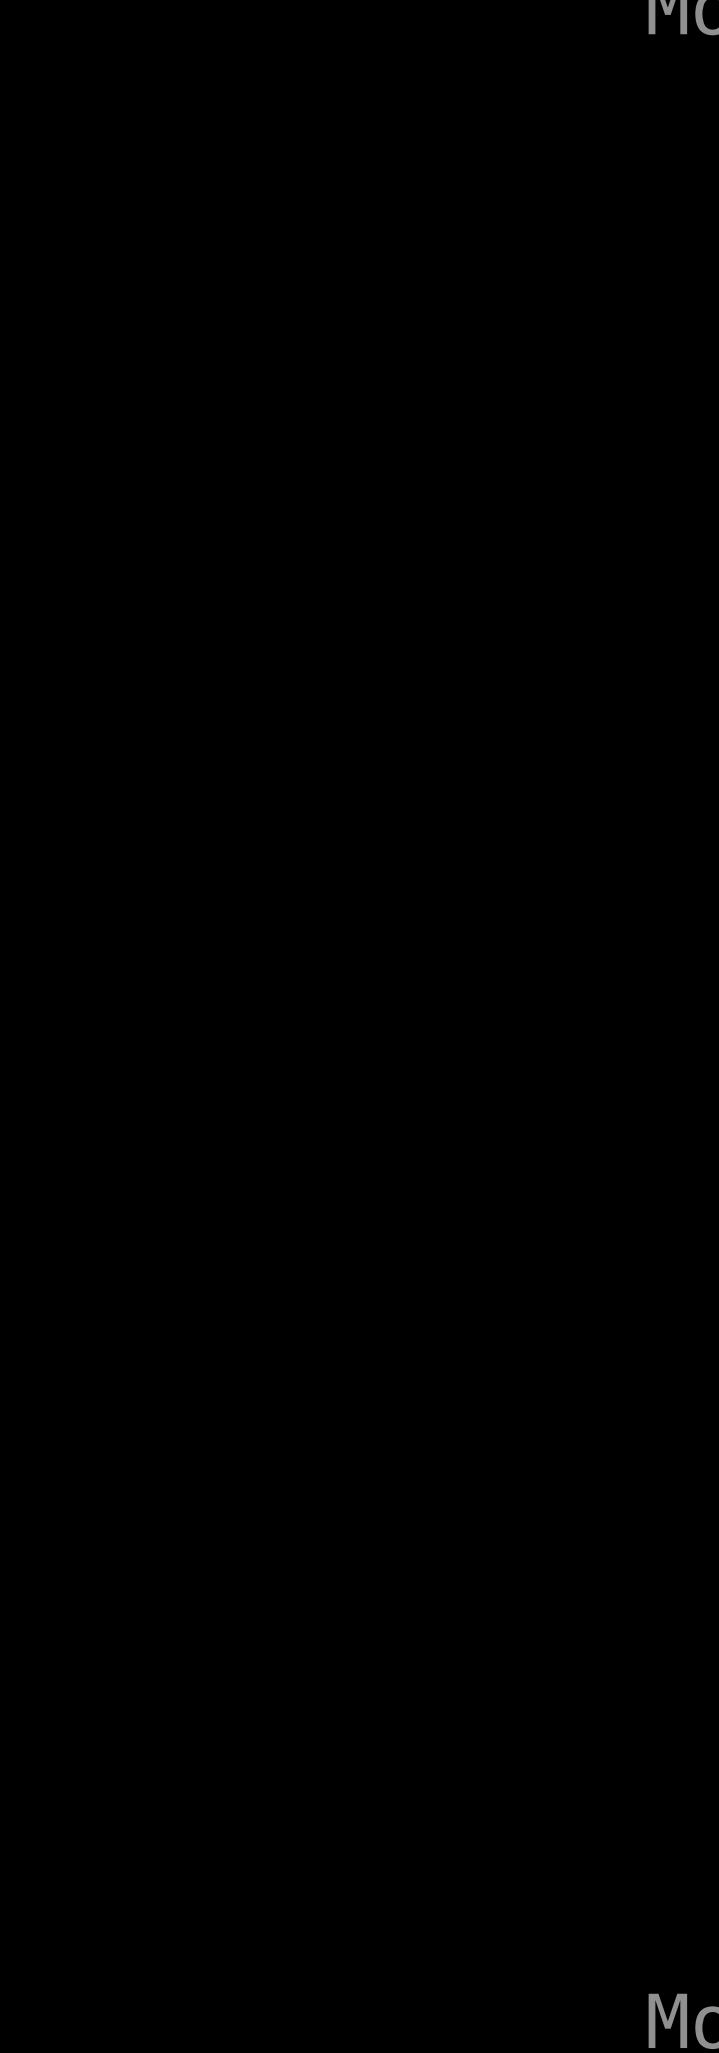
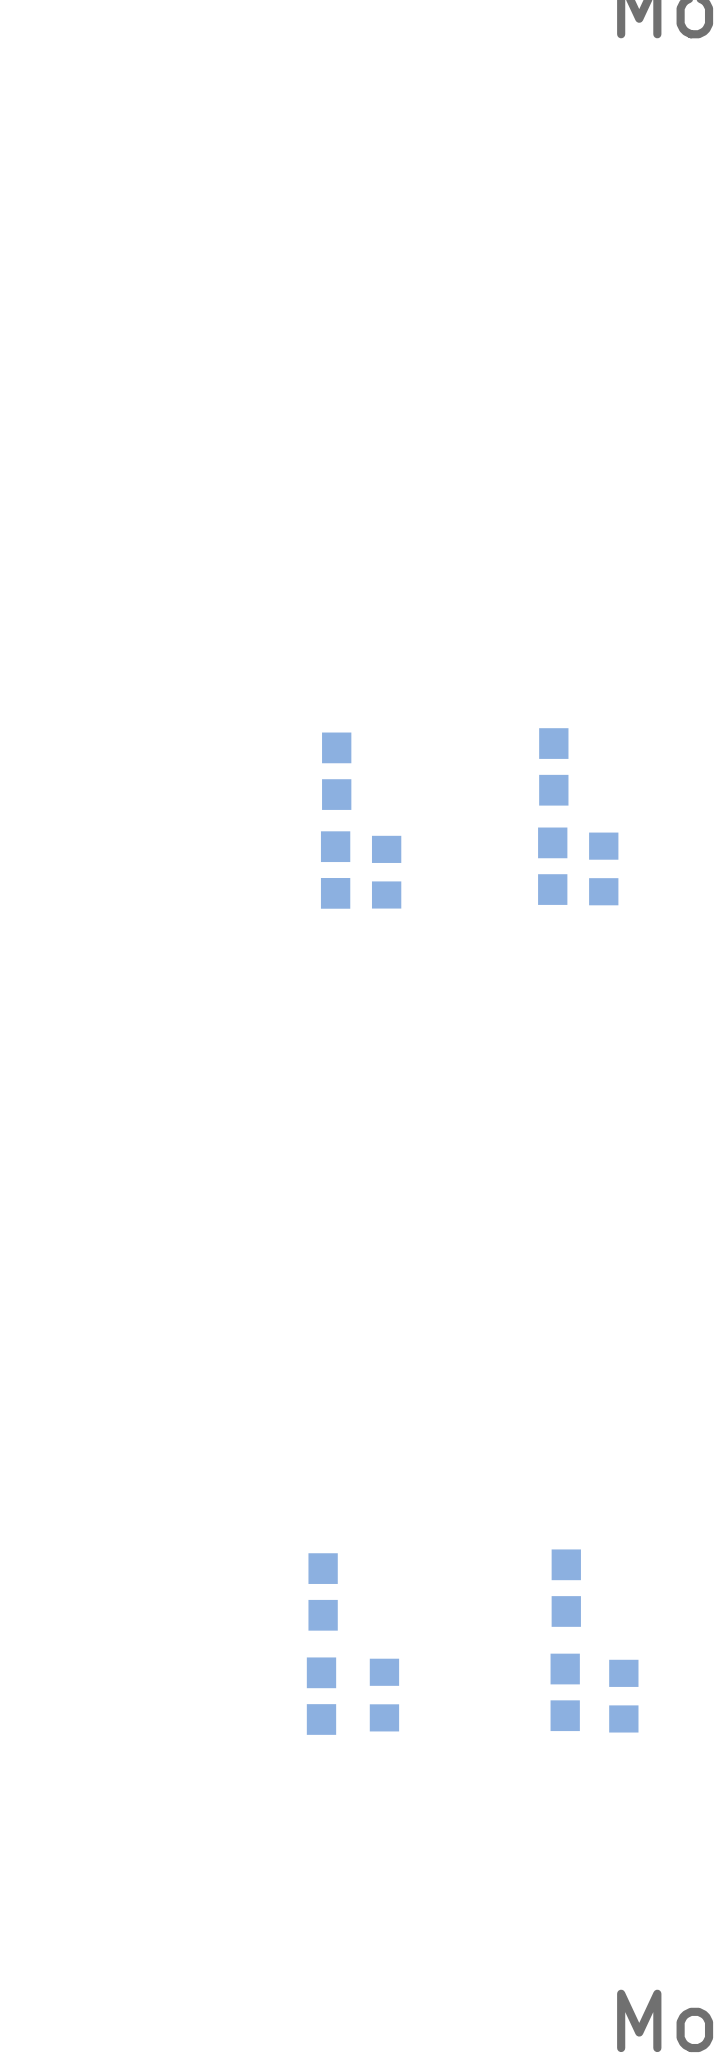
part: none -> (553, 766)
part: none -> (336, 771)
part: none -> (552, 866)
part: none -> (603, 868)
part: none -> (335, 870)
part: none -> (386, 872)
part: none -> (566, 1588)
part: none -> (323, 1591)
part: none -> (565, 1692)
part: none -> (384, 1695)
part: none -> (321, 1696)
part: none -> (623, 1696)

